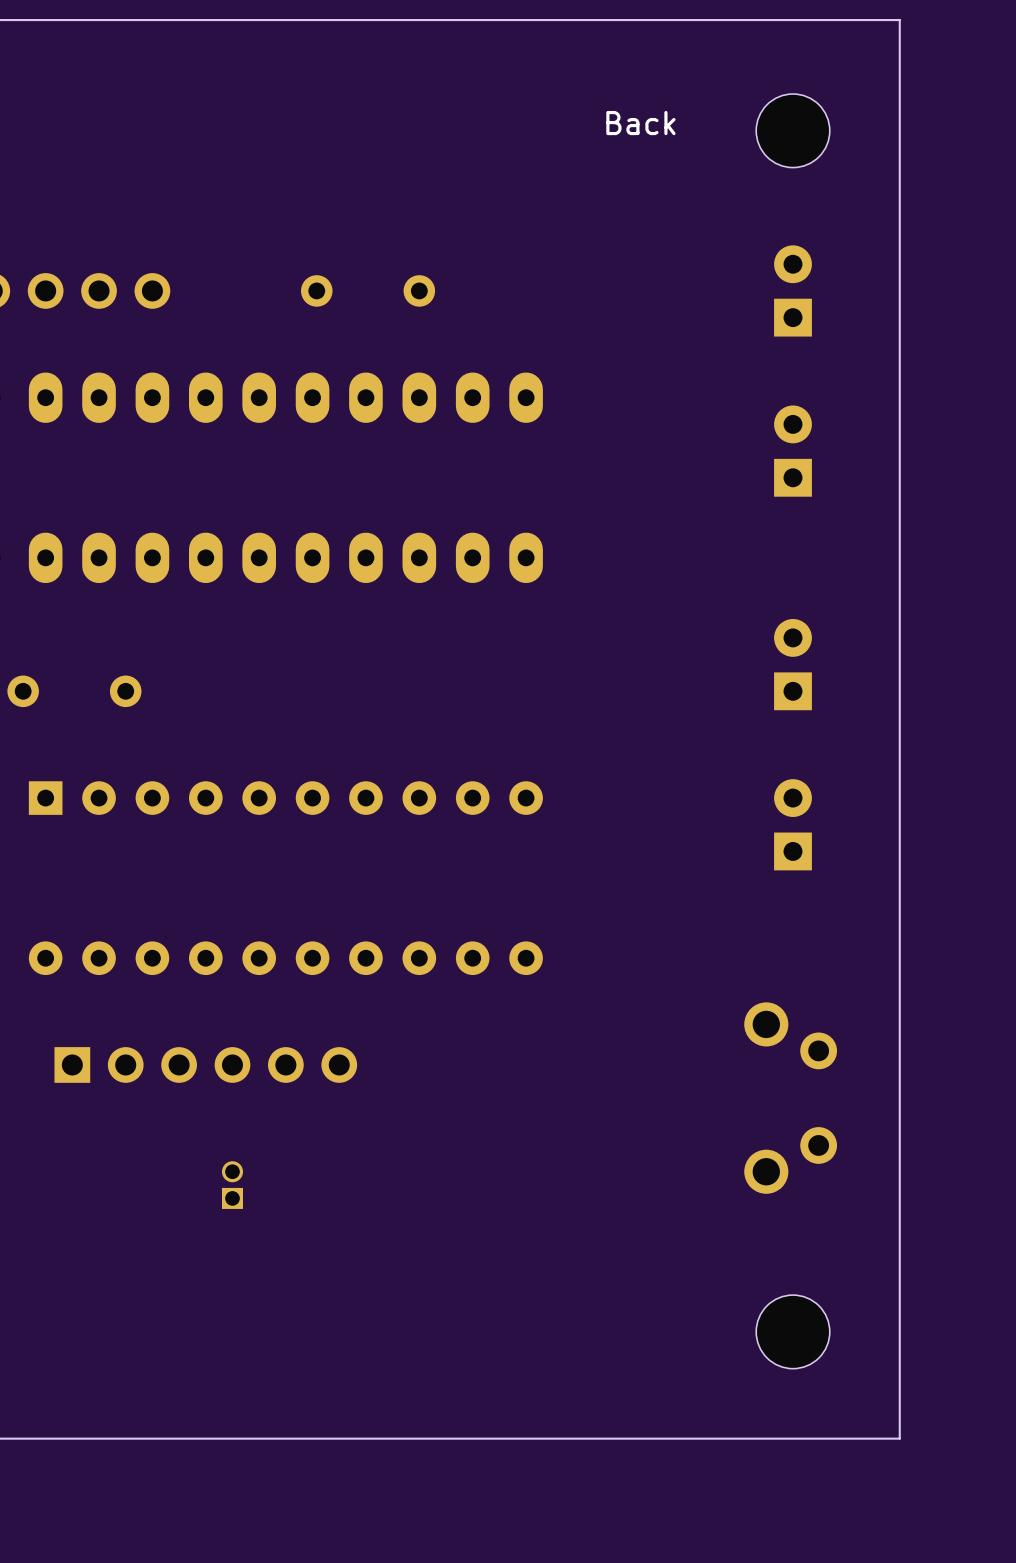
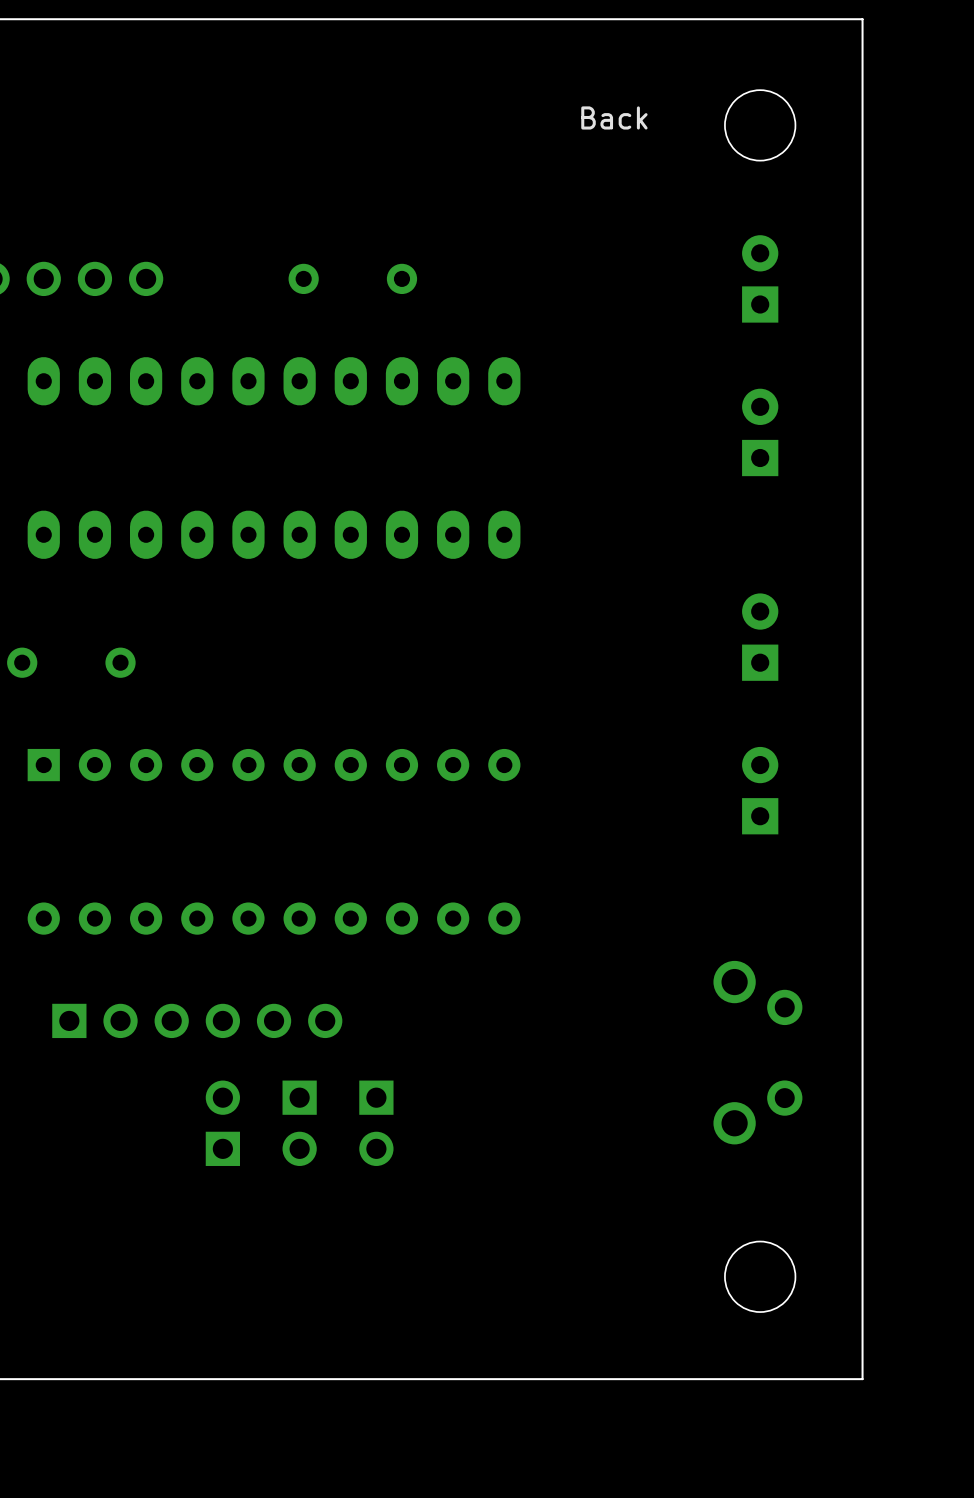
part footprint: [221, 1161, 244, 1209] -> [205, 1080, 241, 1166]
part: none -> (299, 1123)
part: none -> (376, 1123)

